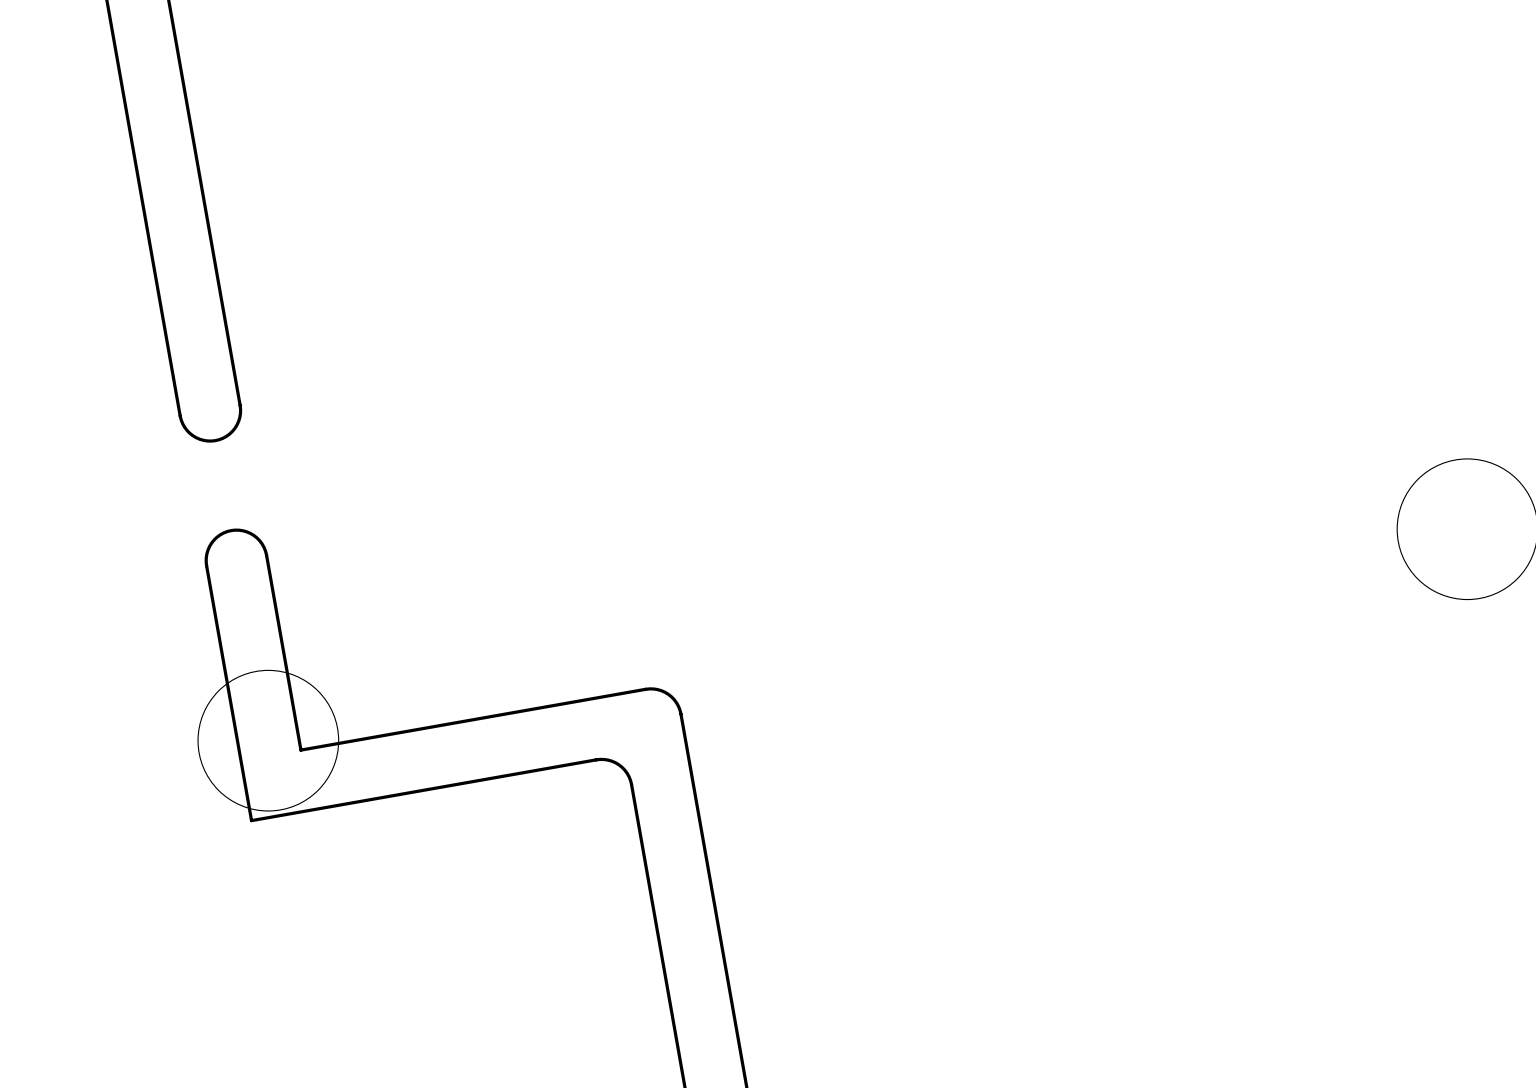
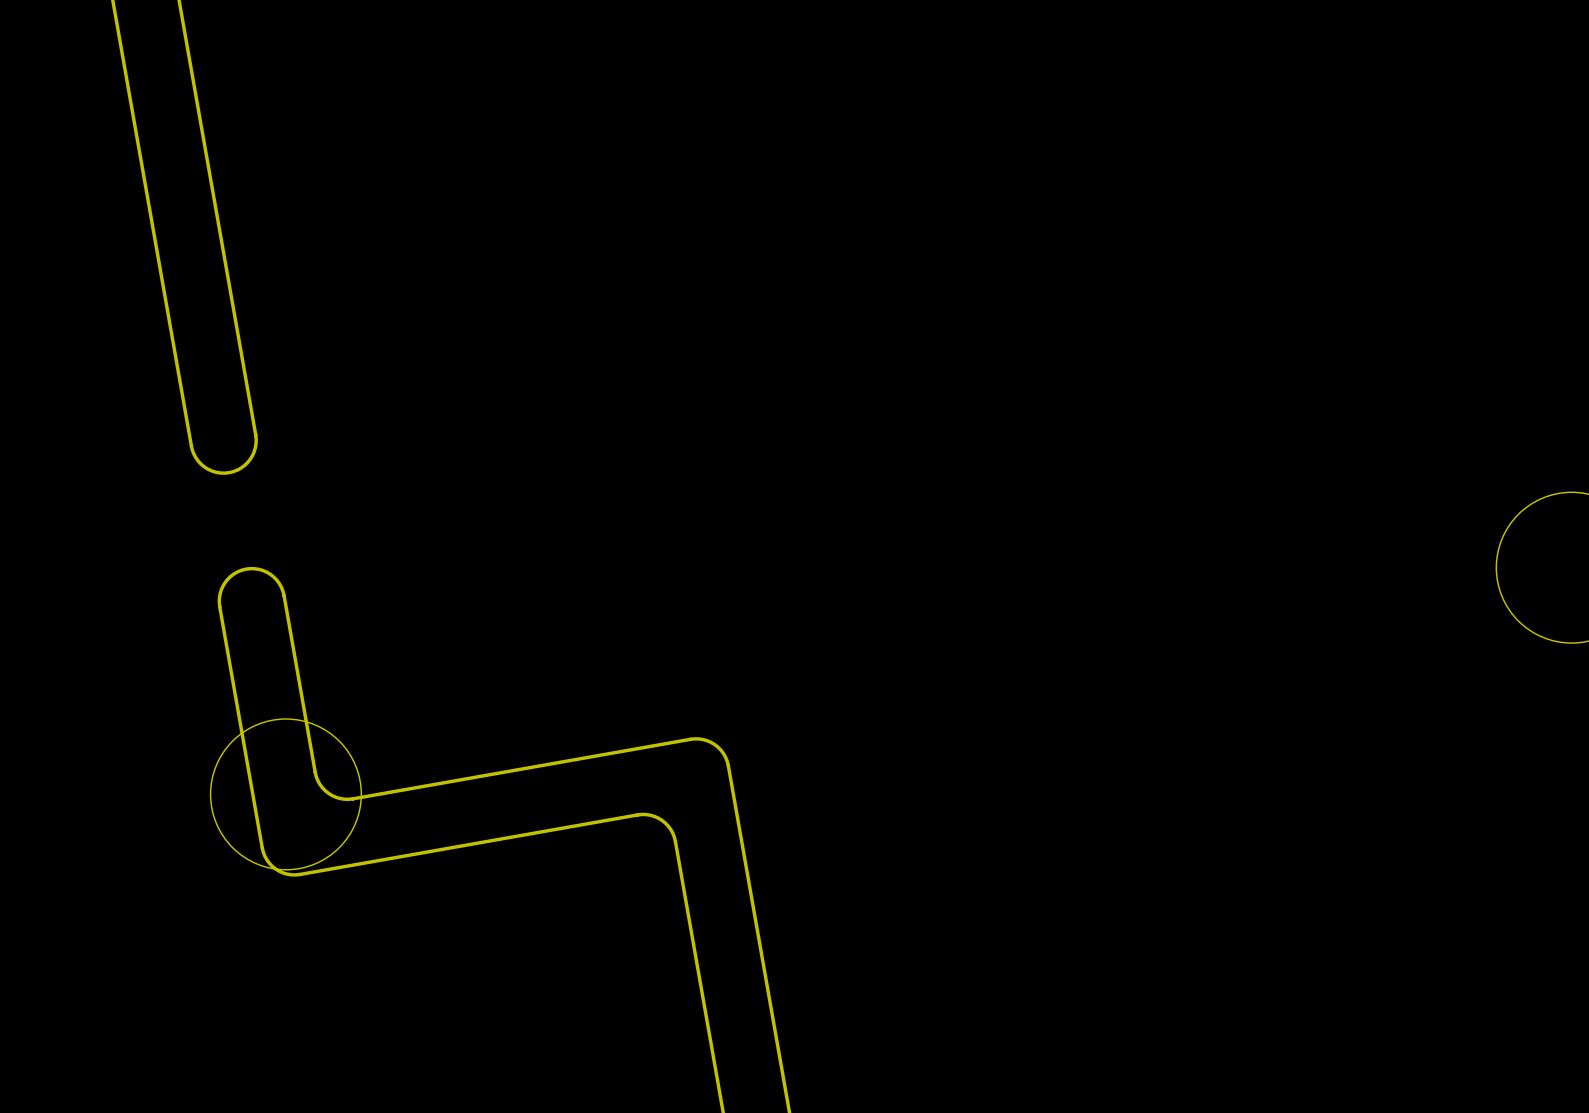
board edge: (295, 720) (300, 750) (330, 744) -> (315, 772) (319, 784) (328, 793) (340, 798) (353, 798)
board edge: (246, 790) (251, 820) (281, 815) -> (262, 847) (266, 859) (275, 869) (287, 874) (300, 874)

